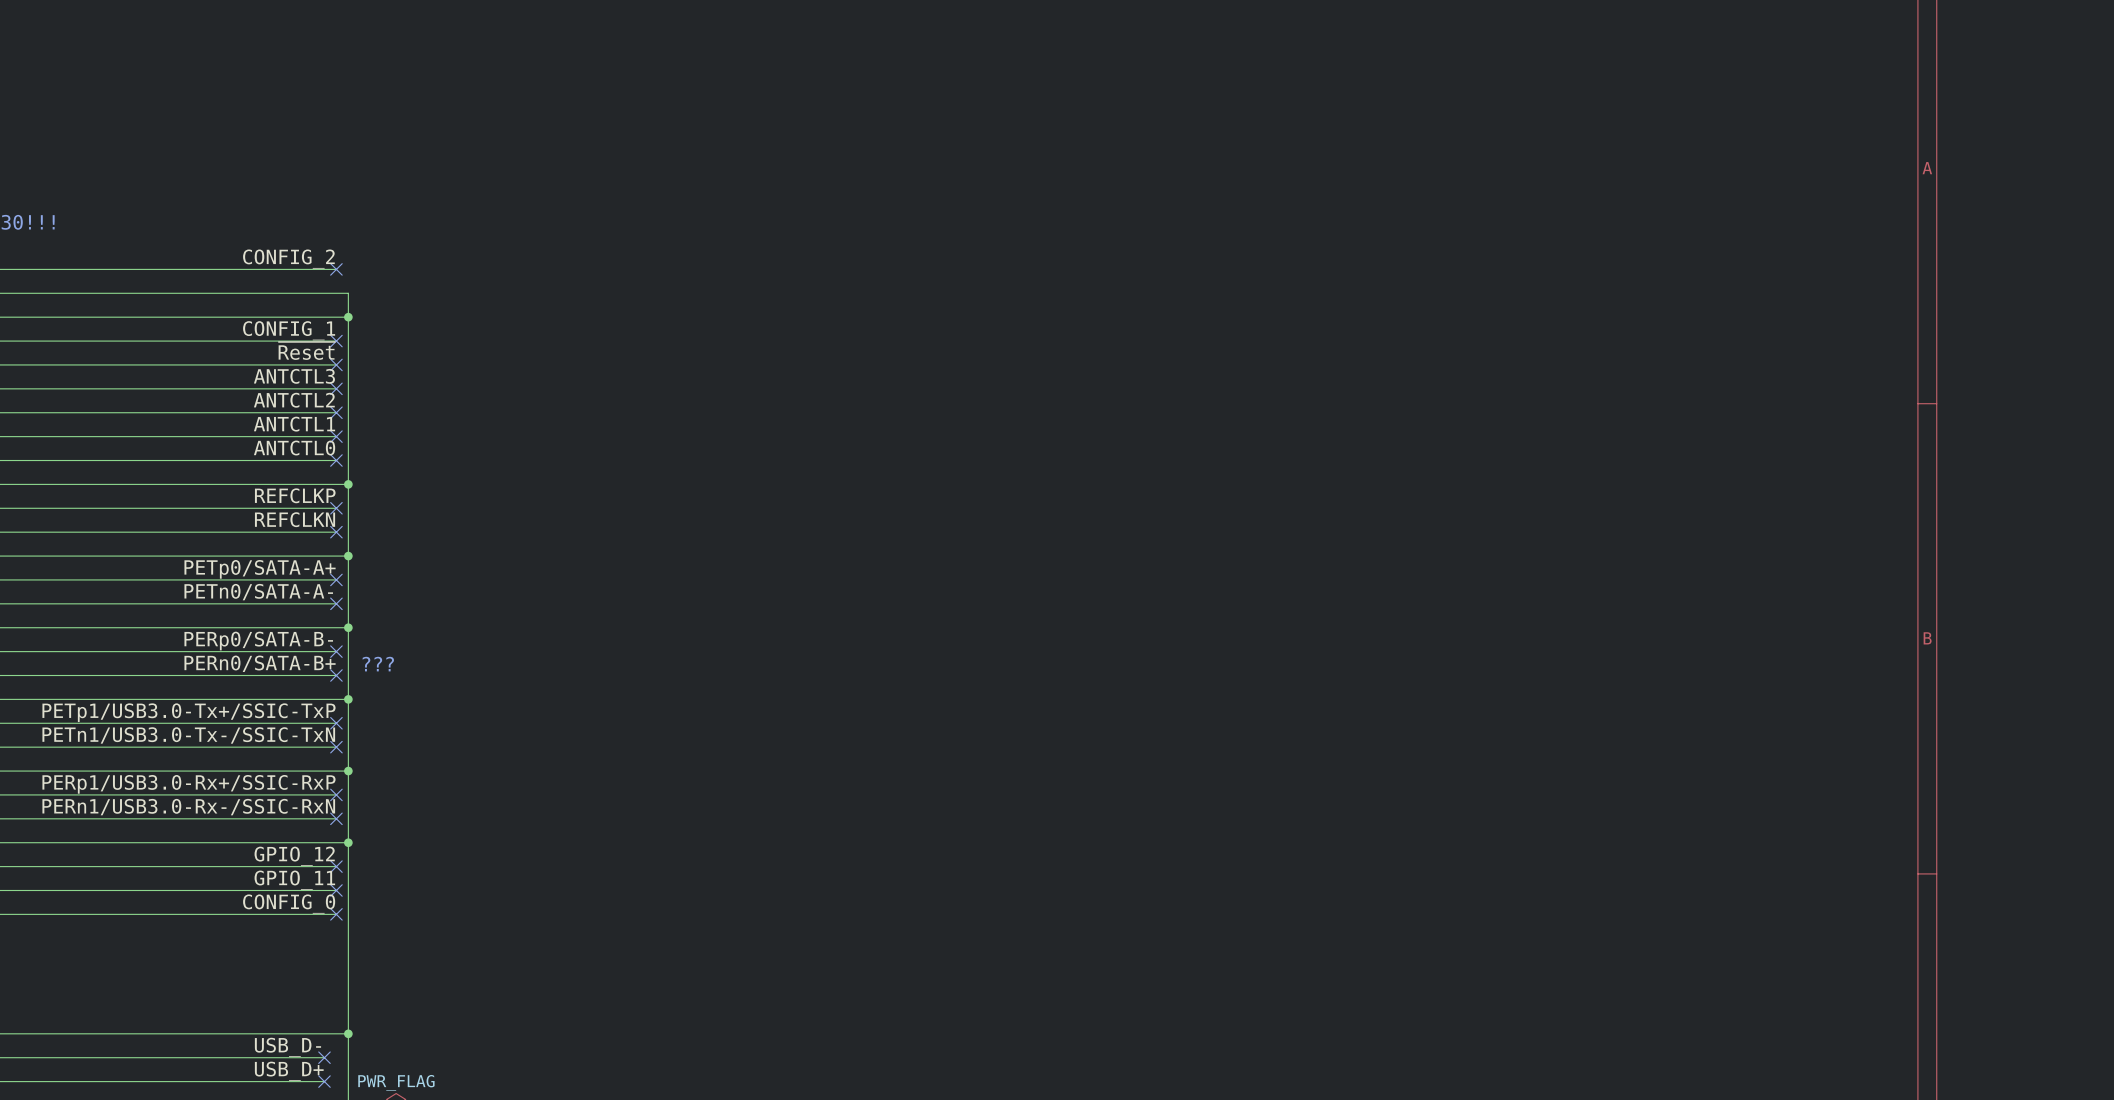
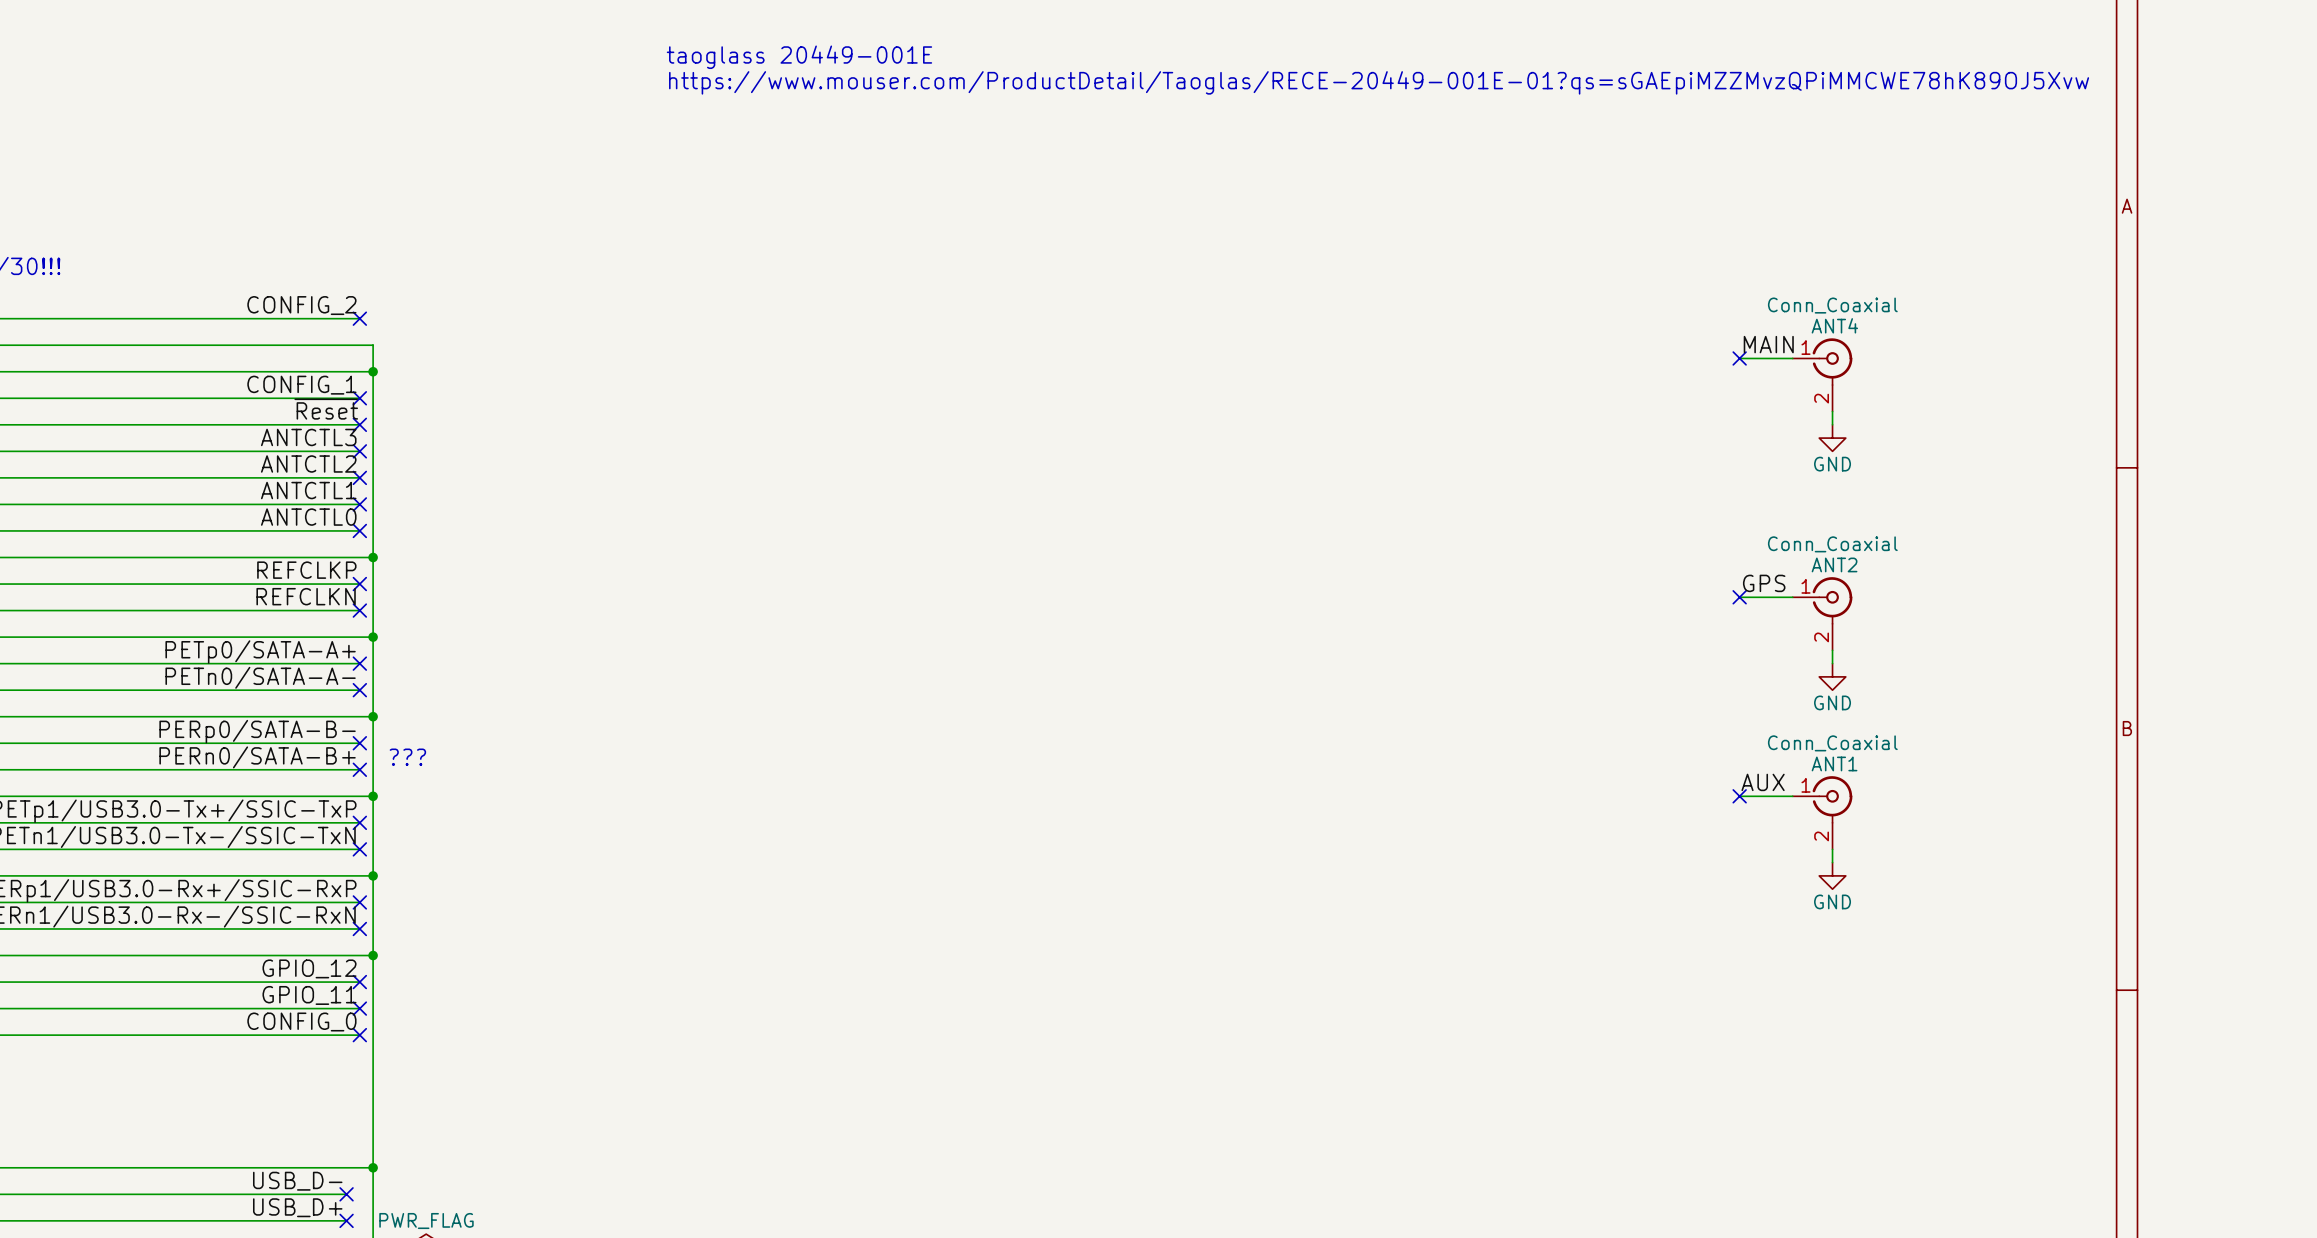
text: none -> taoglass 20449-001E (799, 57)
text: none -> https://www.mouser.com/ProductDetail/Taoglas/RECE-20449-001E-01?qs=sGAEpiMZZMvzQPiMMCWE78hK89OJ5Xvw (1379, 82)
label: none -> MAIN (1768, 344)
wire: none -> (1739, 358) (1792, 358)
no-connect mark: none -> (1739, 358)
ANT4: none -> Conn_Coaxial (1822, 374)
wire: none -> (1832, 411) (1832, 424)
power symbol: none -> GND (1832, 438)
label: none -> GPS (1764, 583)
wire: none -> (1739, 597) (1792, 597)
no-connect mark: none -> (1739, 597)
ANT2: none -> Conn_Coaxial (1822, 613)
wire: none -> (1832, 650) (1832, 663)
power symbol: none -> GND (1832, 676)
label: none -> AUX (1763, 782)
wire: none -> (1739, 796) (1792, 796)
no-connect mark: none -> (1739, 796)
ANT1: none -> Conn_Coaxial (1822, 812)
wire: none -> (1832, 849) (1832, 862)
power symbol: none -> GND (1832, 875)

